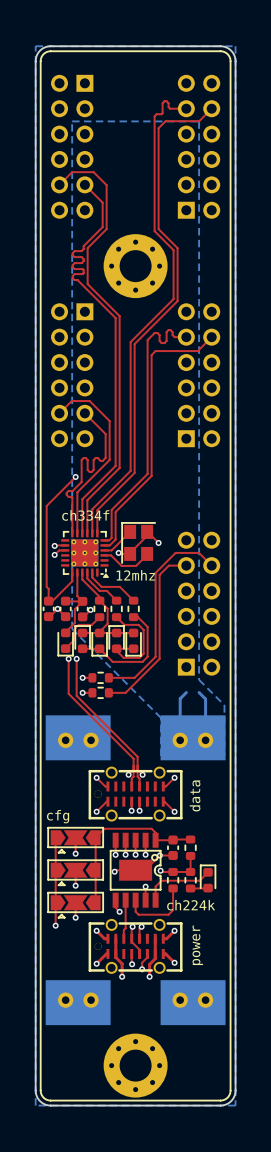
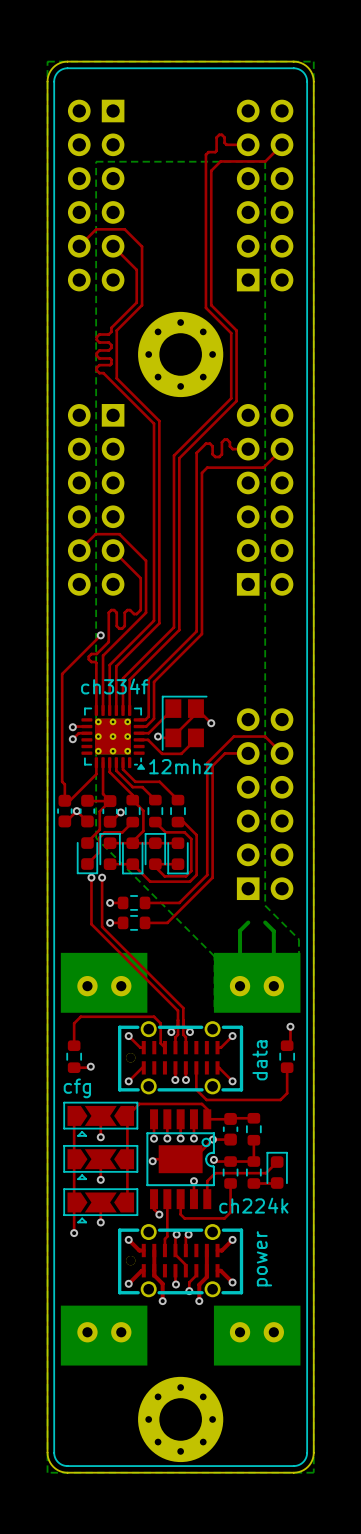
top track: none -> (290, 1026) (290, 1042) (287, 1045)
via: none -> (290, 1026)
top track: none -> (74, 1045) (74, 1023) (80, 1016) (154, 1016) (160, 1023) (160, 1043) (164, 1047)
part: none -> (74, 1056)
part: none -> (287, 1056)
top track: none -> (90, 1066) (74, 1067)
via: none -> (90, 1066)
top track: none -> (287, 1067) (287, 1093) (280, 1099) (206, 1099) (196, 1089) (196, 1067)

